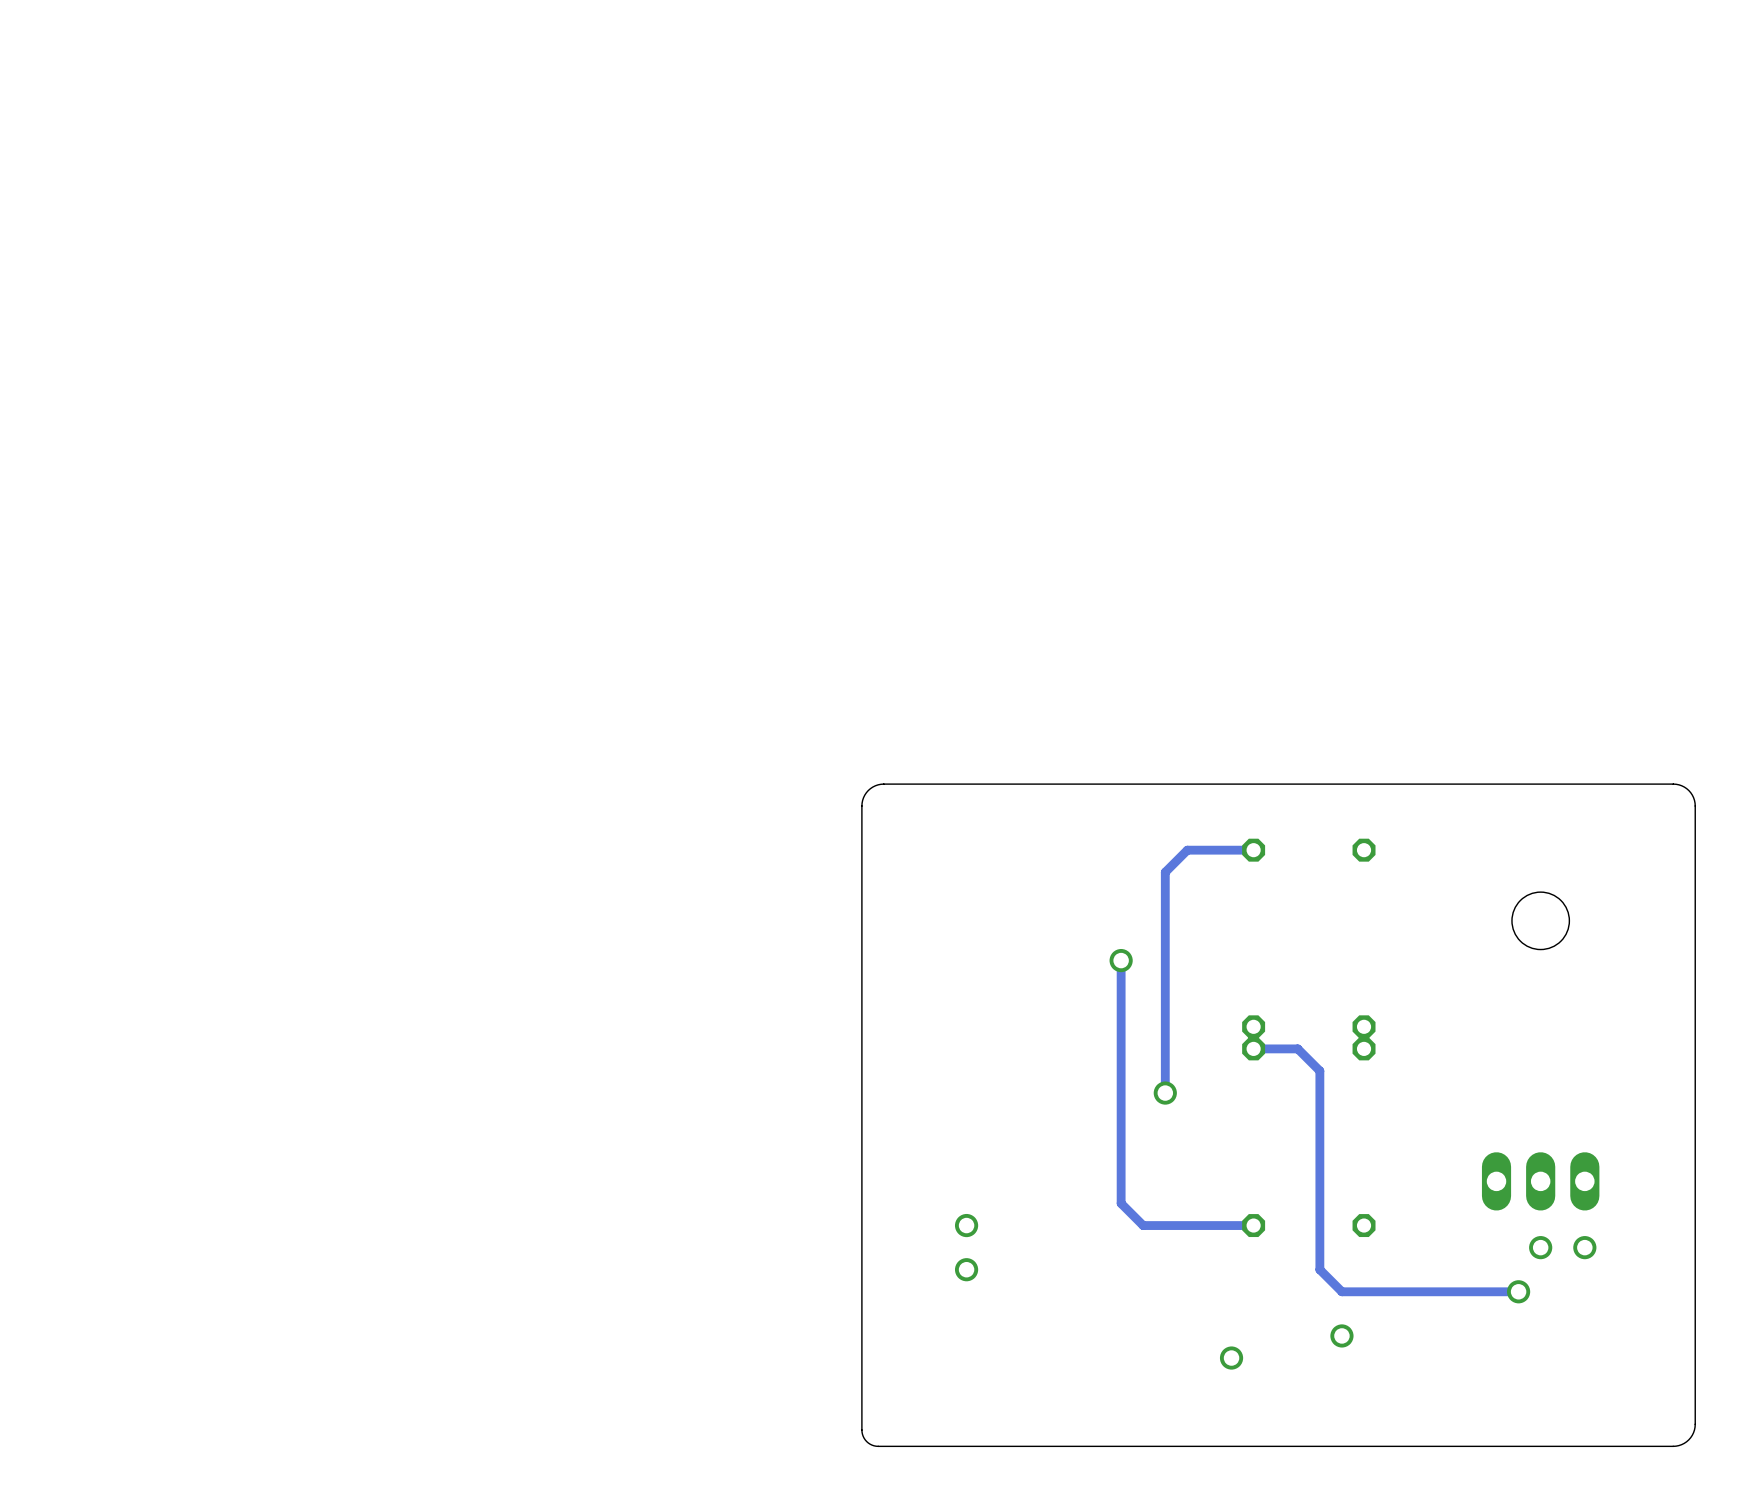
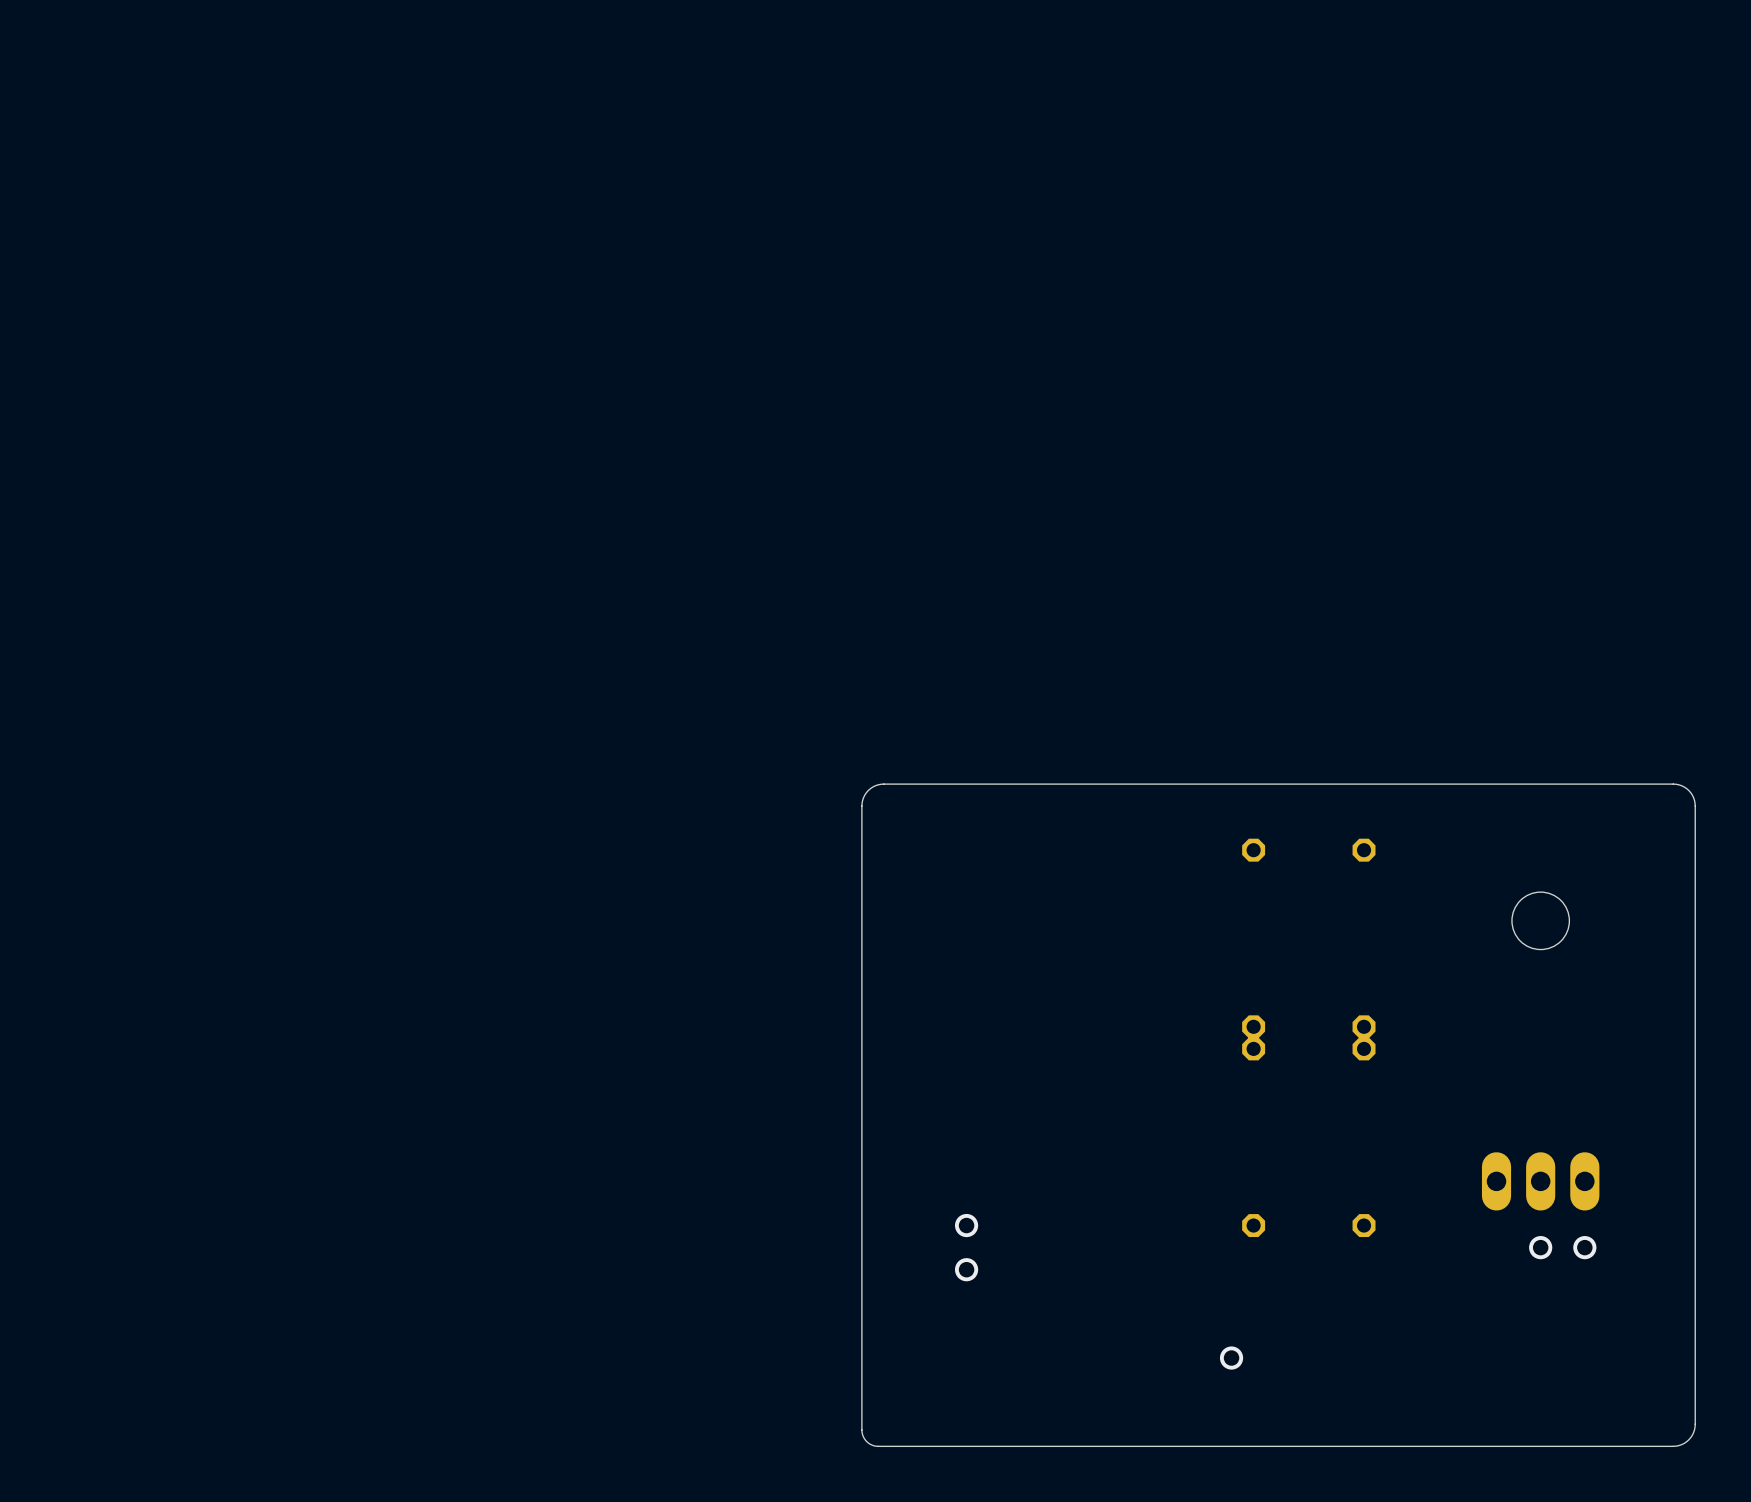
track: (1253, 850) (1187, 850) (1165, 872) (1165, 1093) -> none
track: (1121, 960) (1121, 1203) (1143, 1225) (1253, 1225) -> none
via: (1121, 960) -> none
track: (1253, 1048) (1297, 1048) (1319, 1070) (1319, 1269) (1341, 1291) (1518, 1291) -> none
via: (1165, 1093) -> none
via: (1518, 1291) -> none
via: (1341, 1335) -> none

